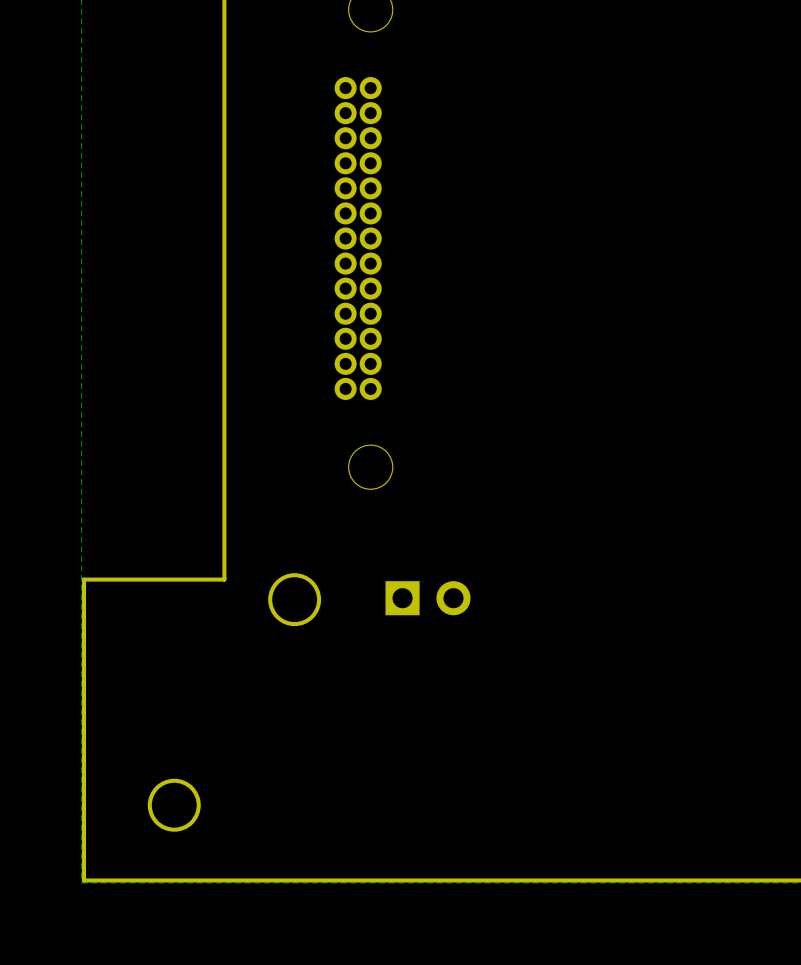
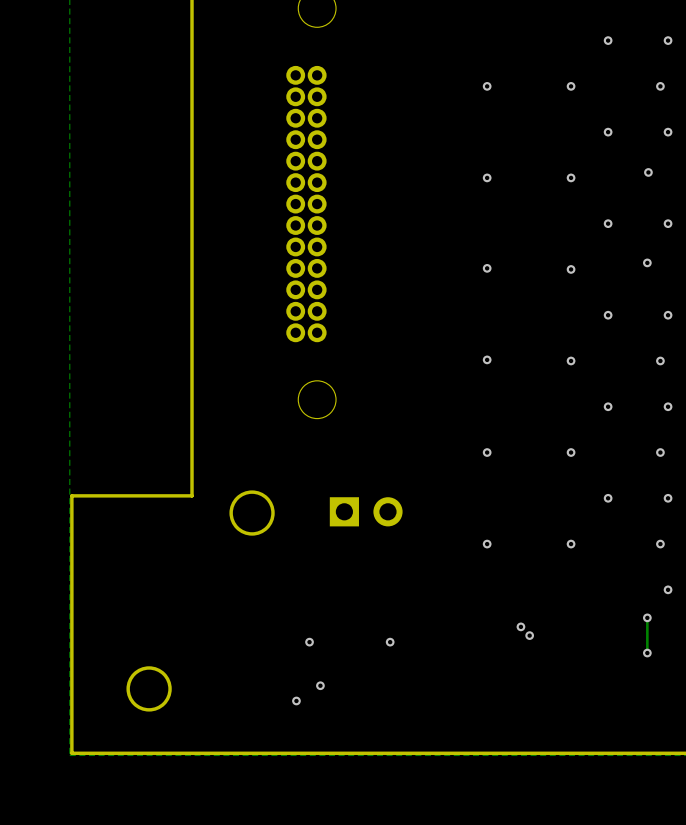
via: none -> (608, 40)
via: none -> (668, 40)
via: none -> (487, 86)
via: none -> (571, 86)
via: none -> (660, 86)
via: none -> (608, 132)
via: none -> (668, 132)
via: none -> (648, 172)
via: none -> (487, 177)
via: none -> (571, 177)
via: none -> (608, 223)
via: none -> (668, 223)
via: none -> (647, 262)
via: none -> (487, 268)
via: none -> (571, 269)
via: none -> (608, 315)
via: none -> (668, 315)
via: none -> (487, 359)
via: none -> (571, 360)
via: none -> (660, 360)
via: none -> (608, 406)
via: none -> (668, 406)
via: none -> (487, 452)
via: none -> (571, 452)
via: none -> (660, 452)
via: none -> (608, 498)
via: none -> (668, 498)
via: none -> (487, 544)
via: none -> (571, 544)
via: none -> (660, 544)
via: none -> (668, 589)
track: none -> (647, 617) (647, 653)
via: none -> (647, 617)
via: none -> (520, 626)
via: none -> (529, 635)
via: none -> (309, 642)
via: none -> (390, 642)
via: none -> (647, 653)
via: none -> (320, 685)
via: none -> (296, 700)

